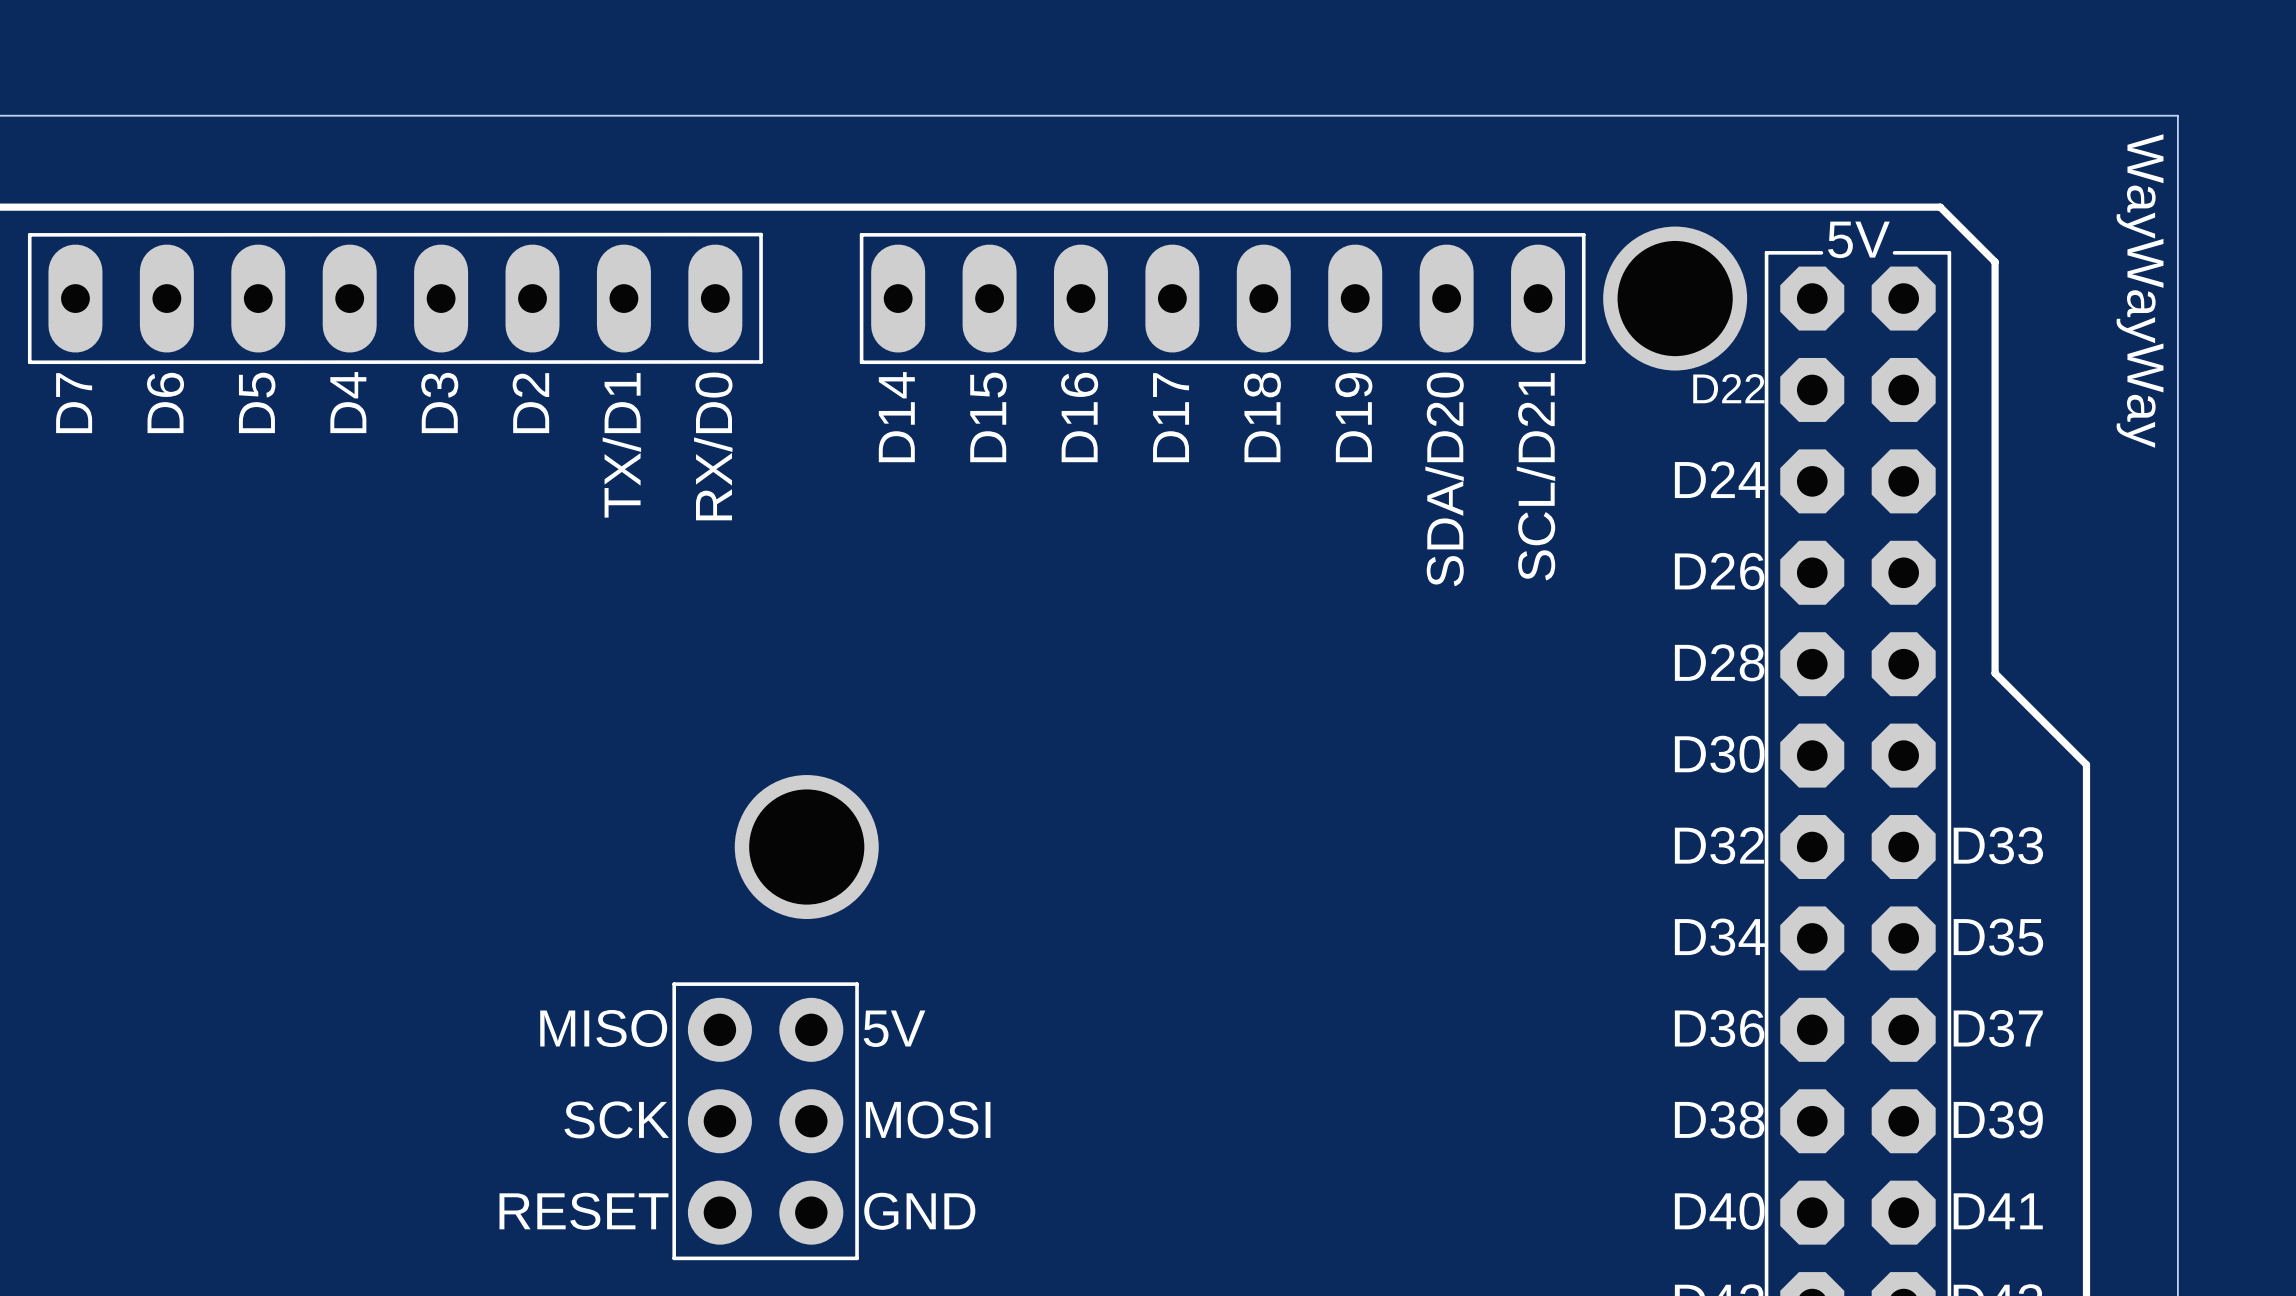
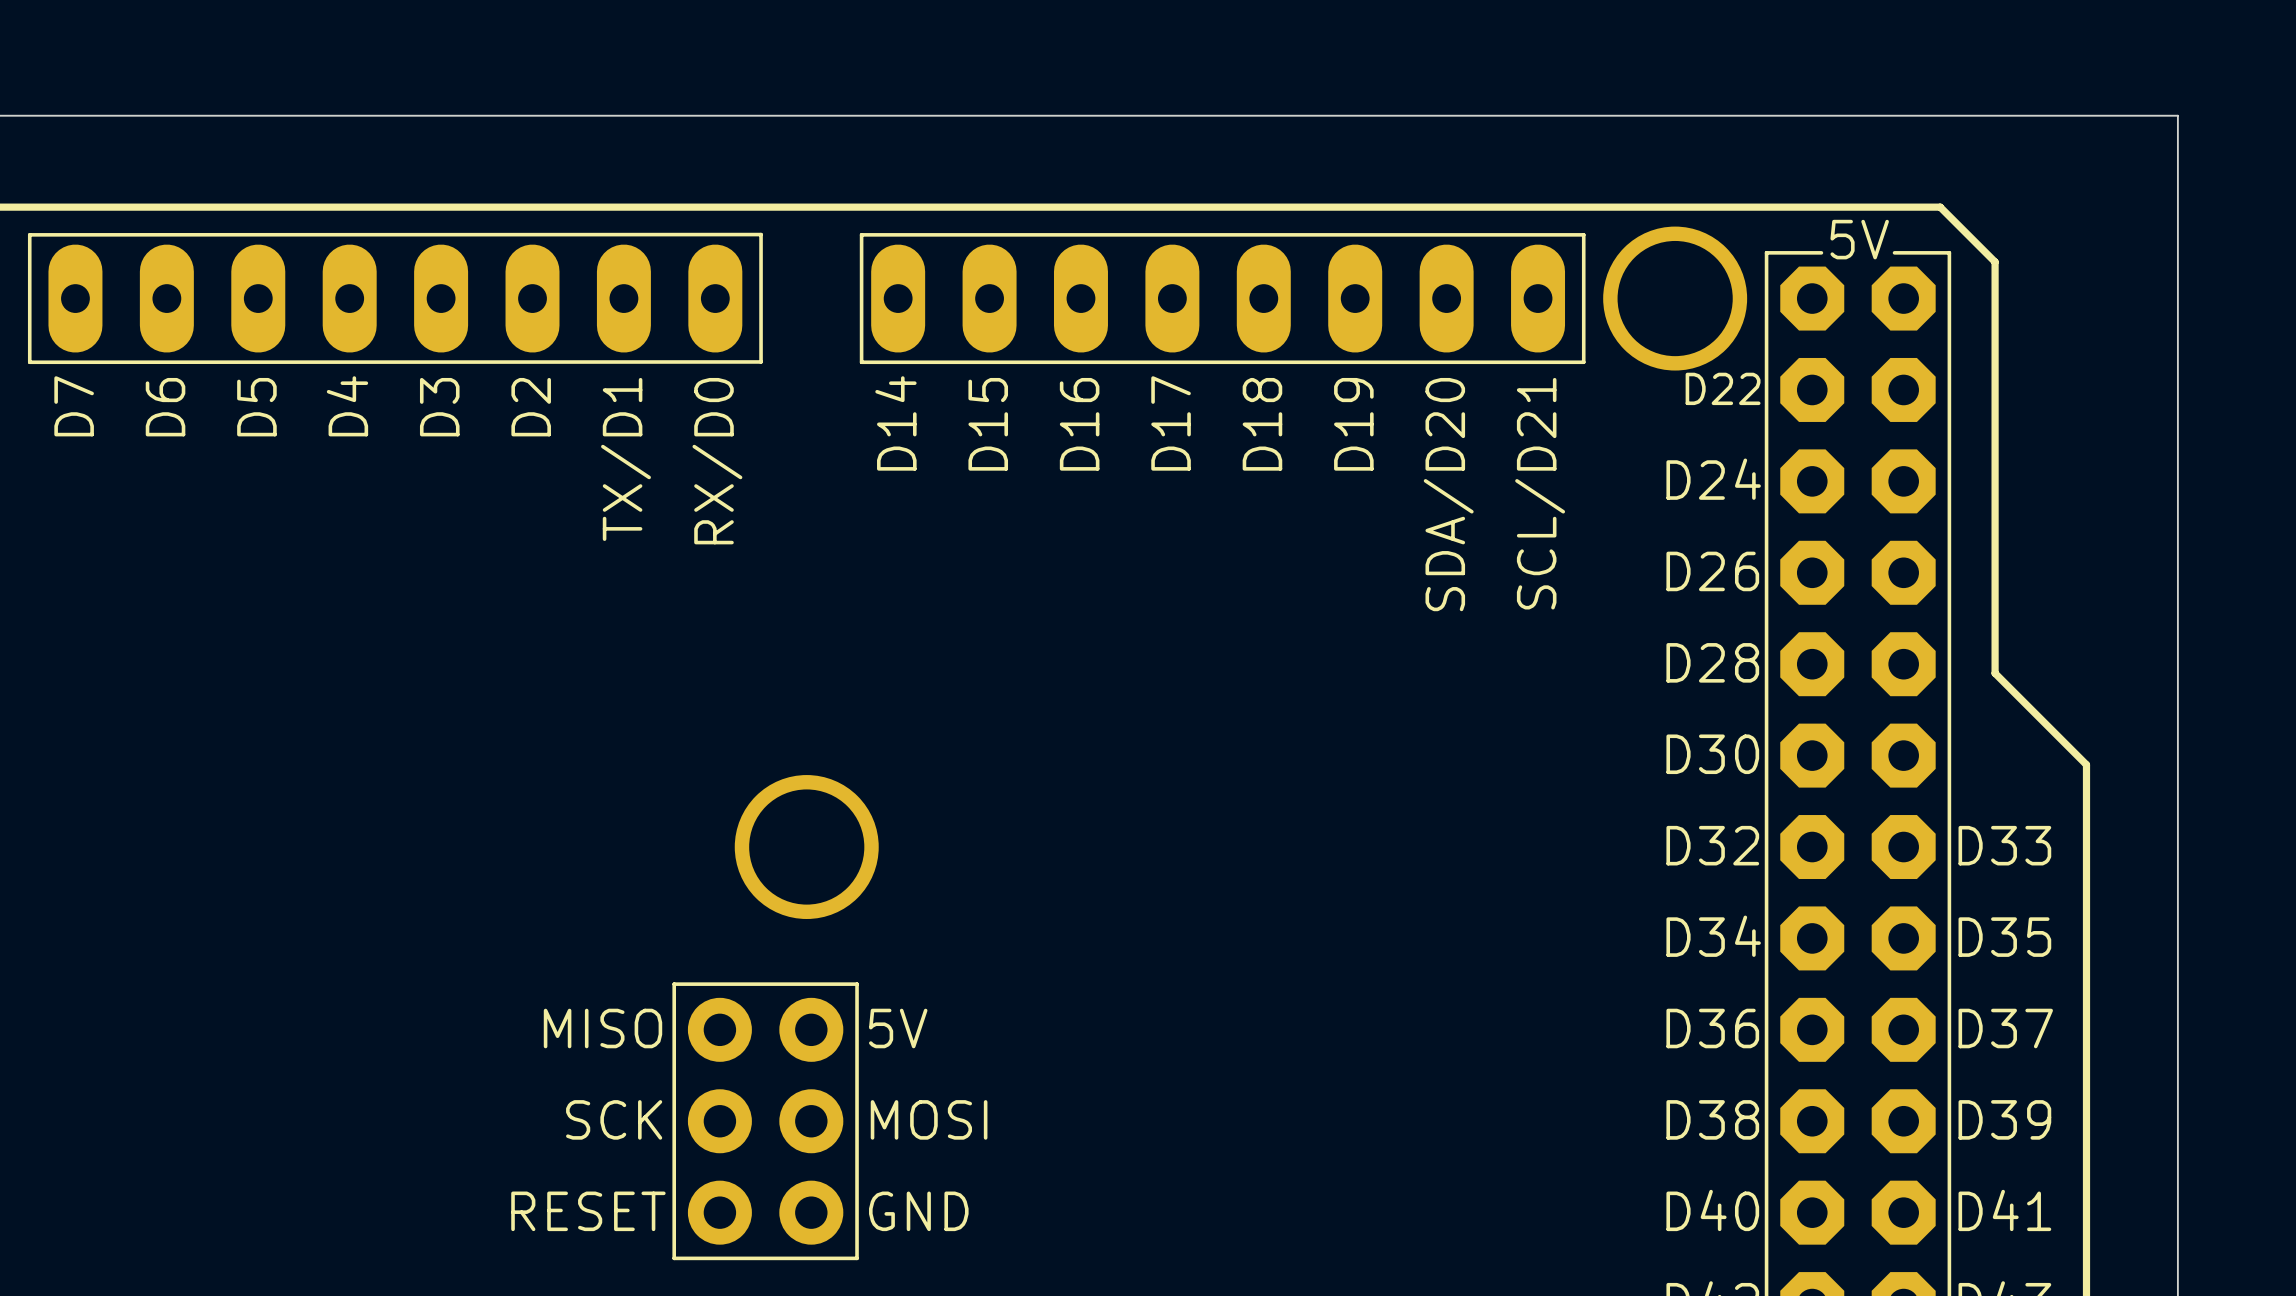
text: WayWayWay (2140, 291) -> none

